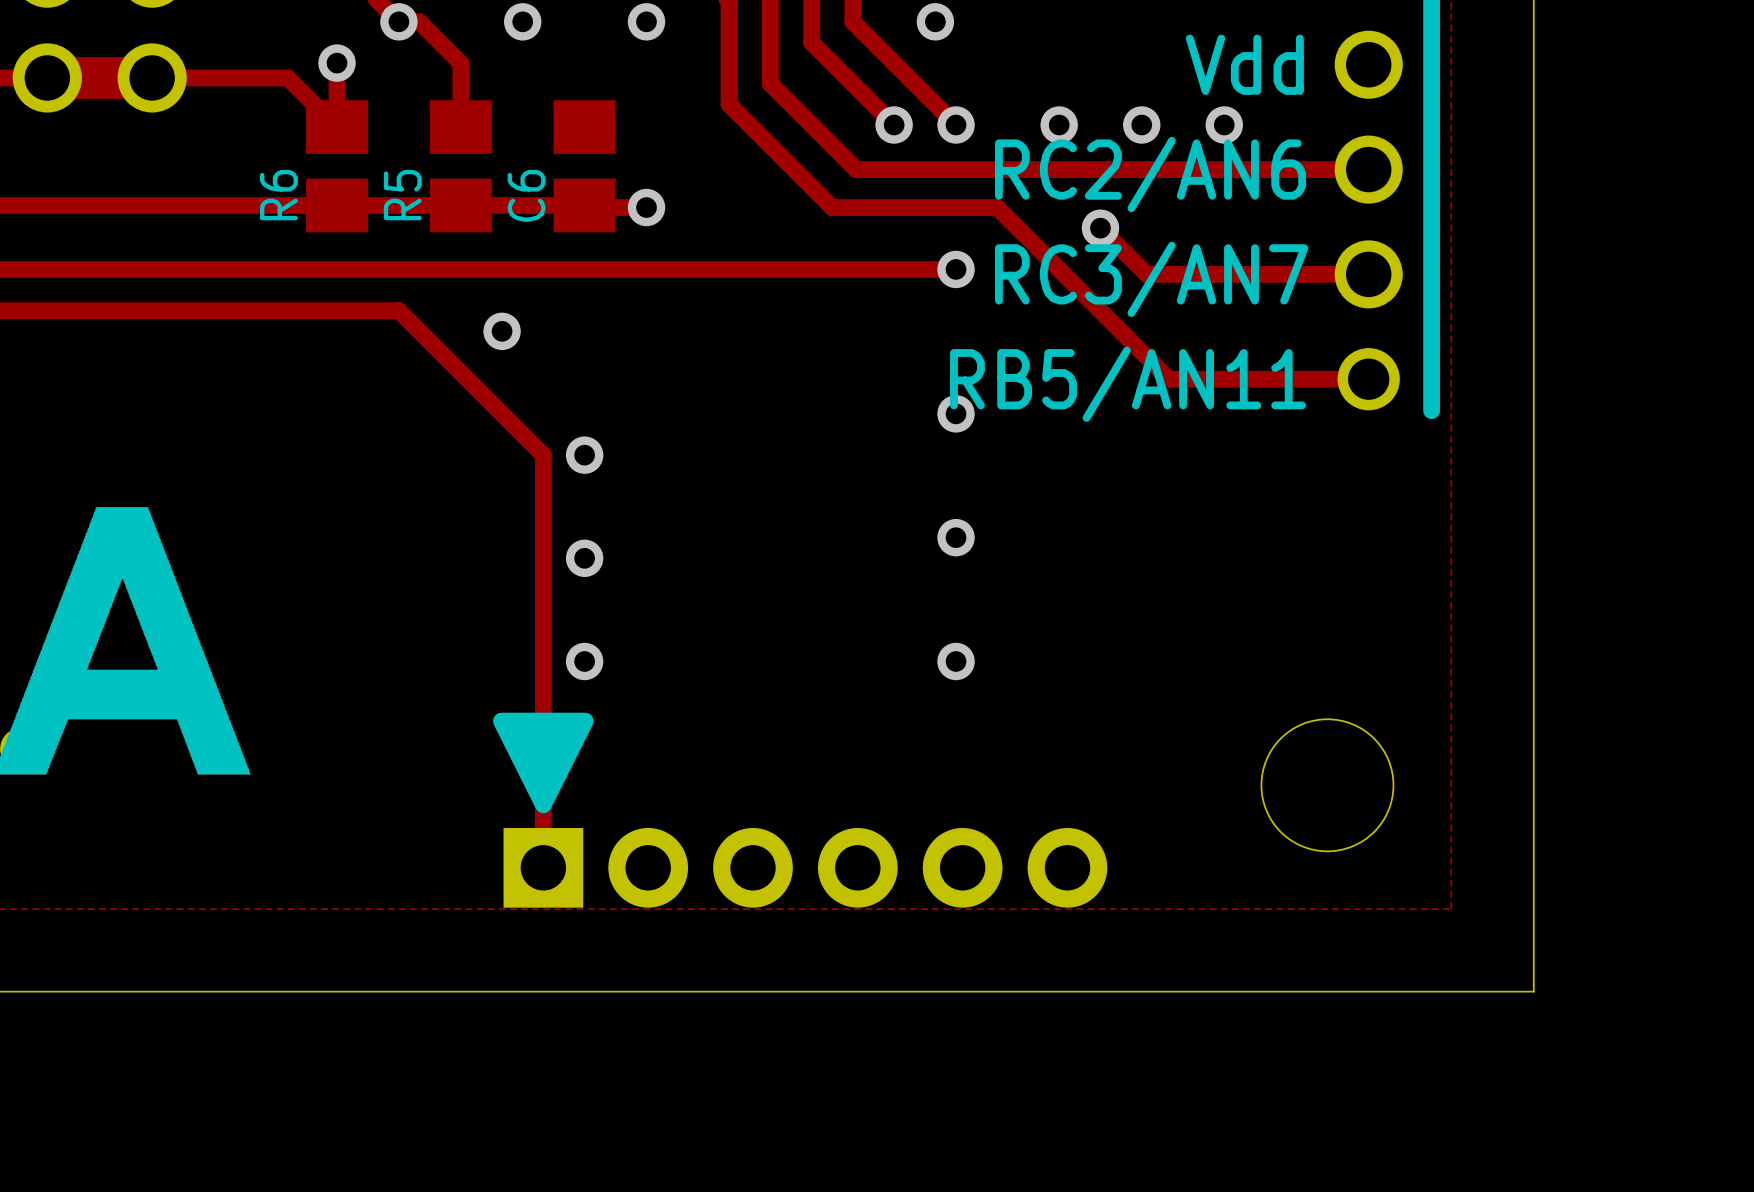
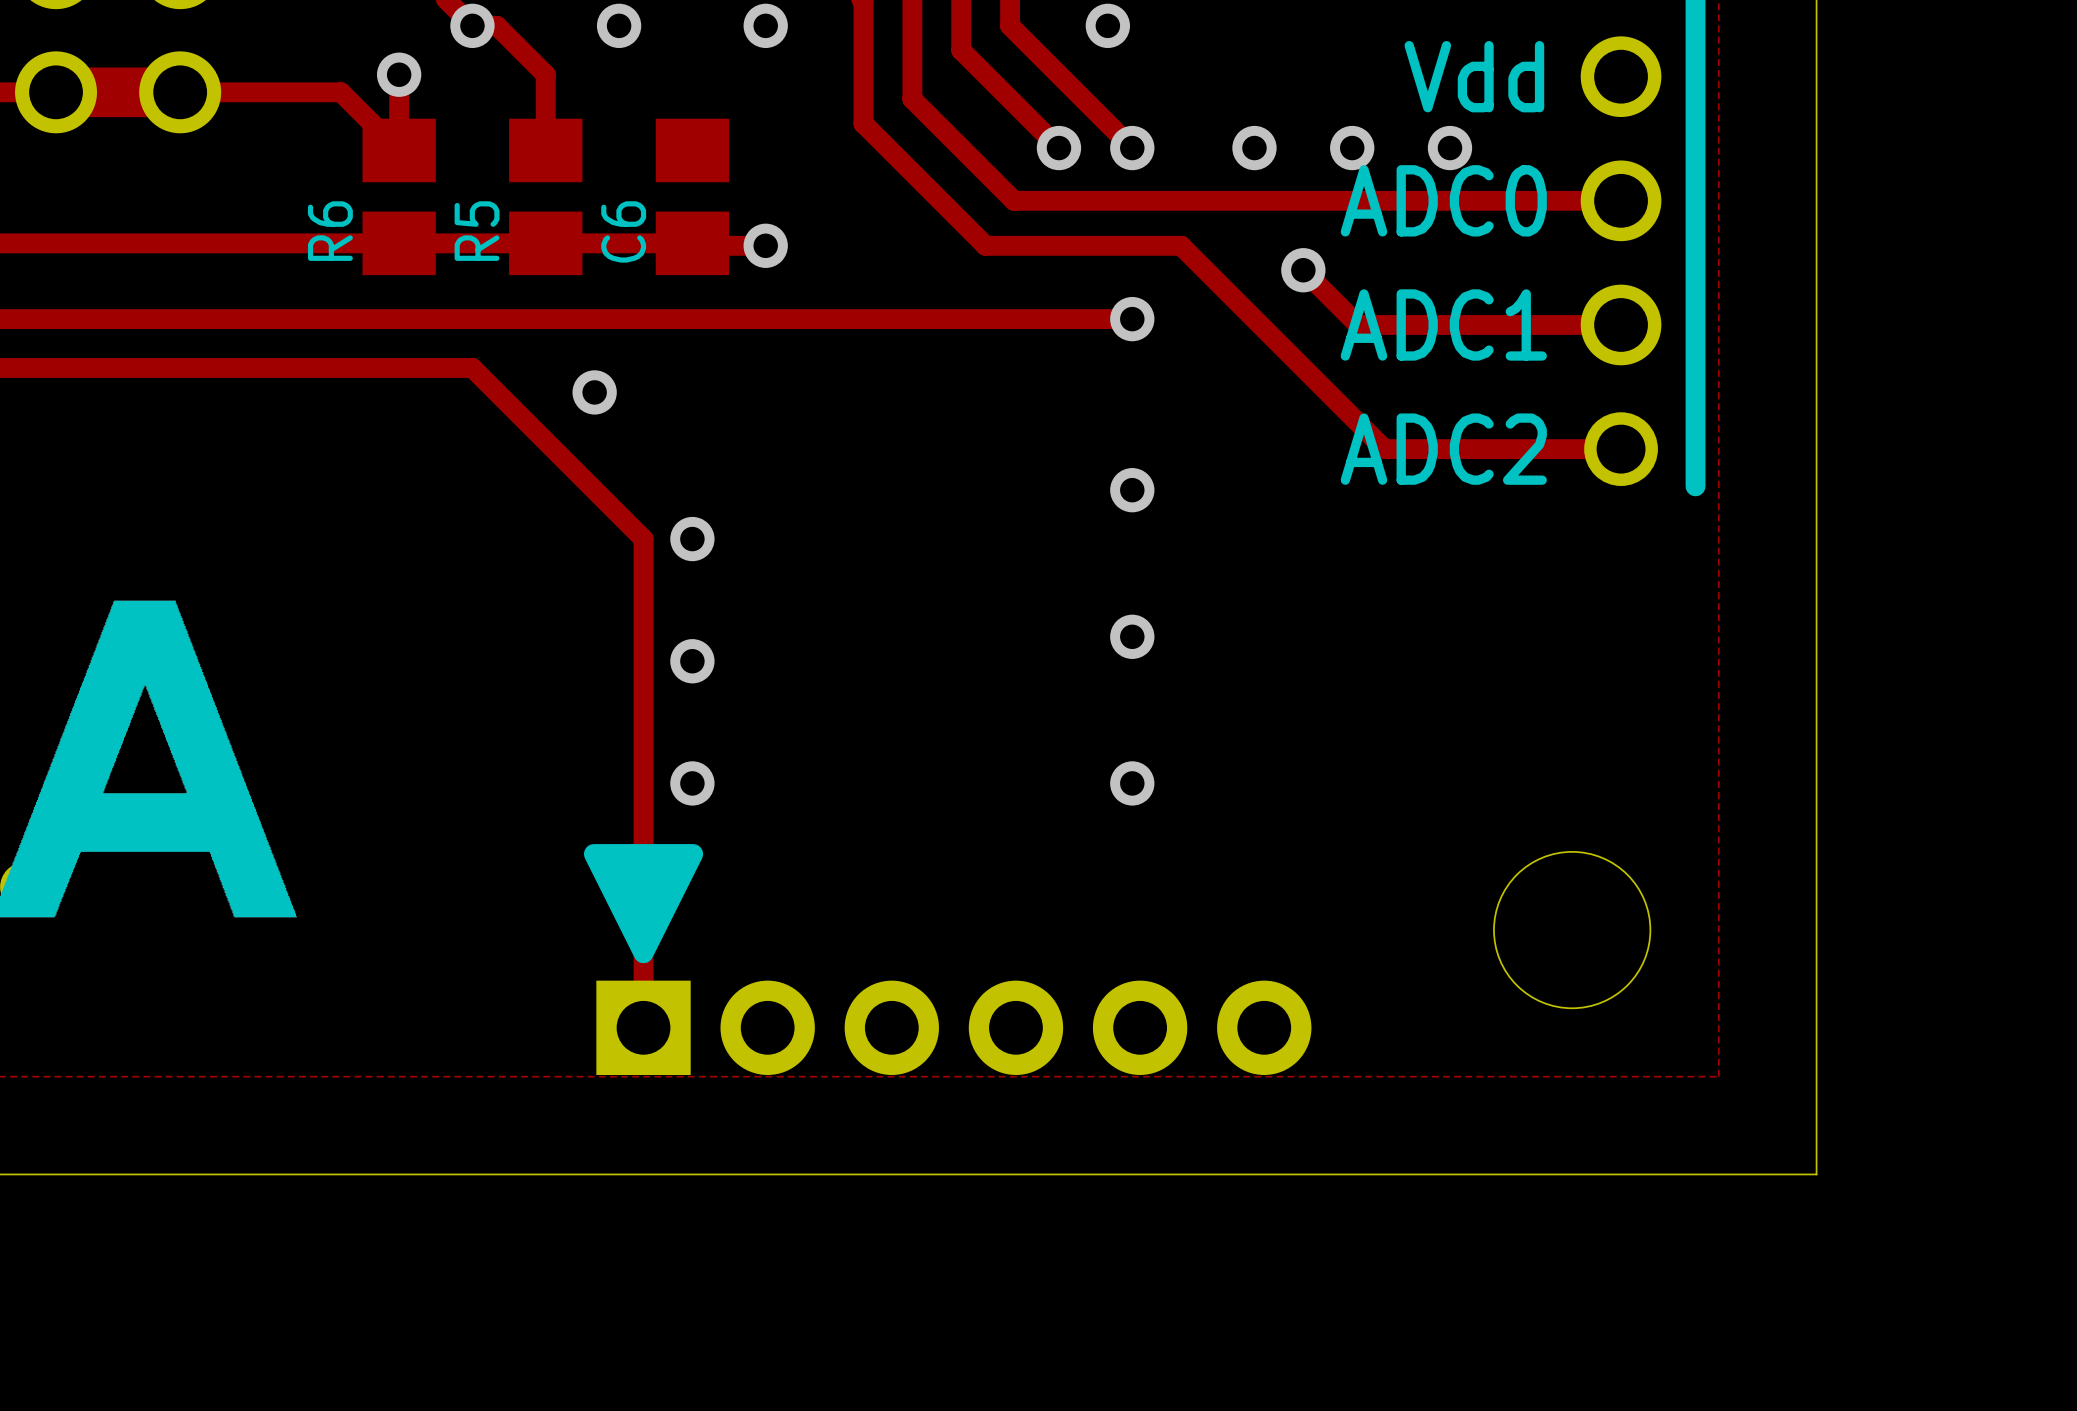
part text: RC2/AN6 (1150, 174) -> ADC0 (1443, 200)
part text: RC3/AN7 (1151, 279) -> ADC1 (1443, 324)
part text: RB5/AN11 (1128, 384) -> ADC2 (1443, 449)

